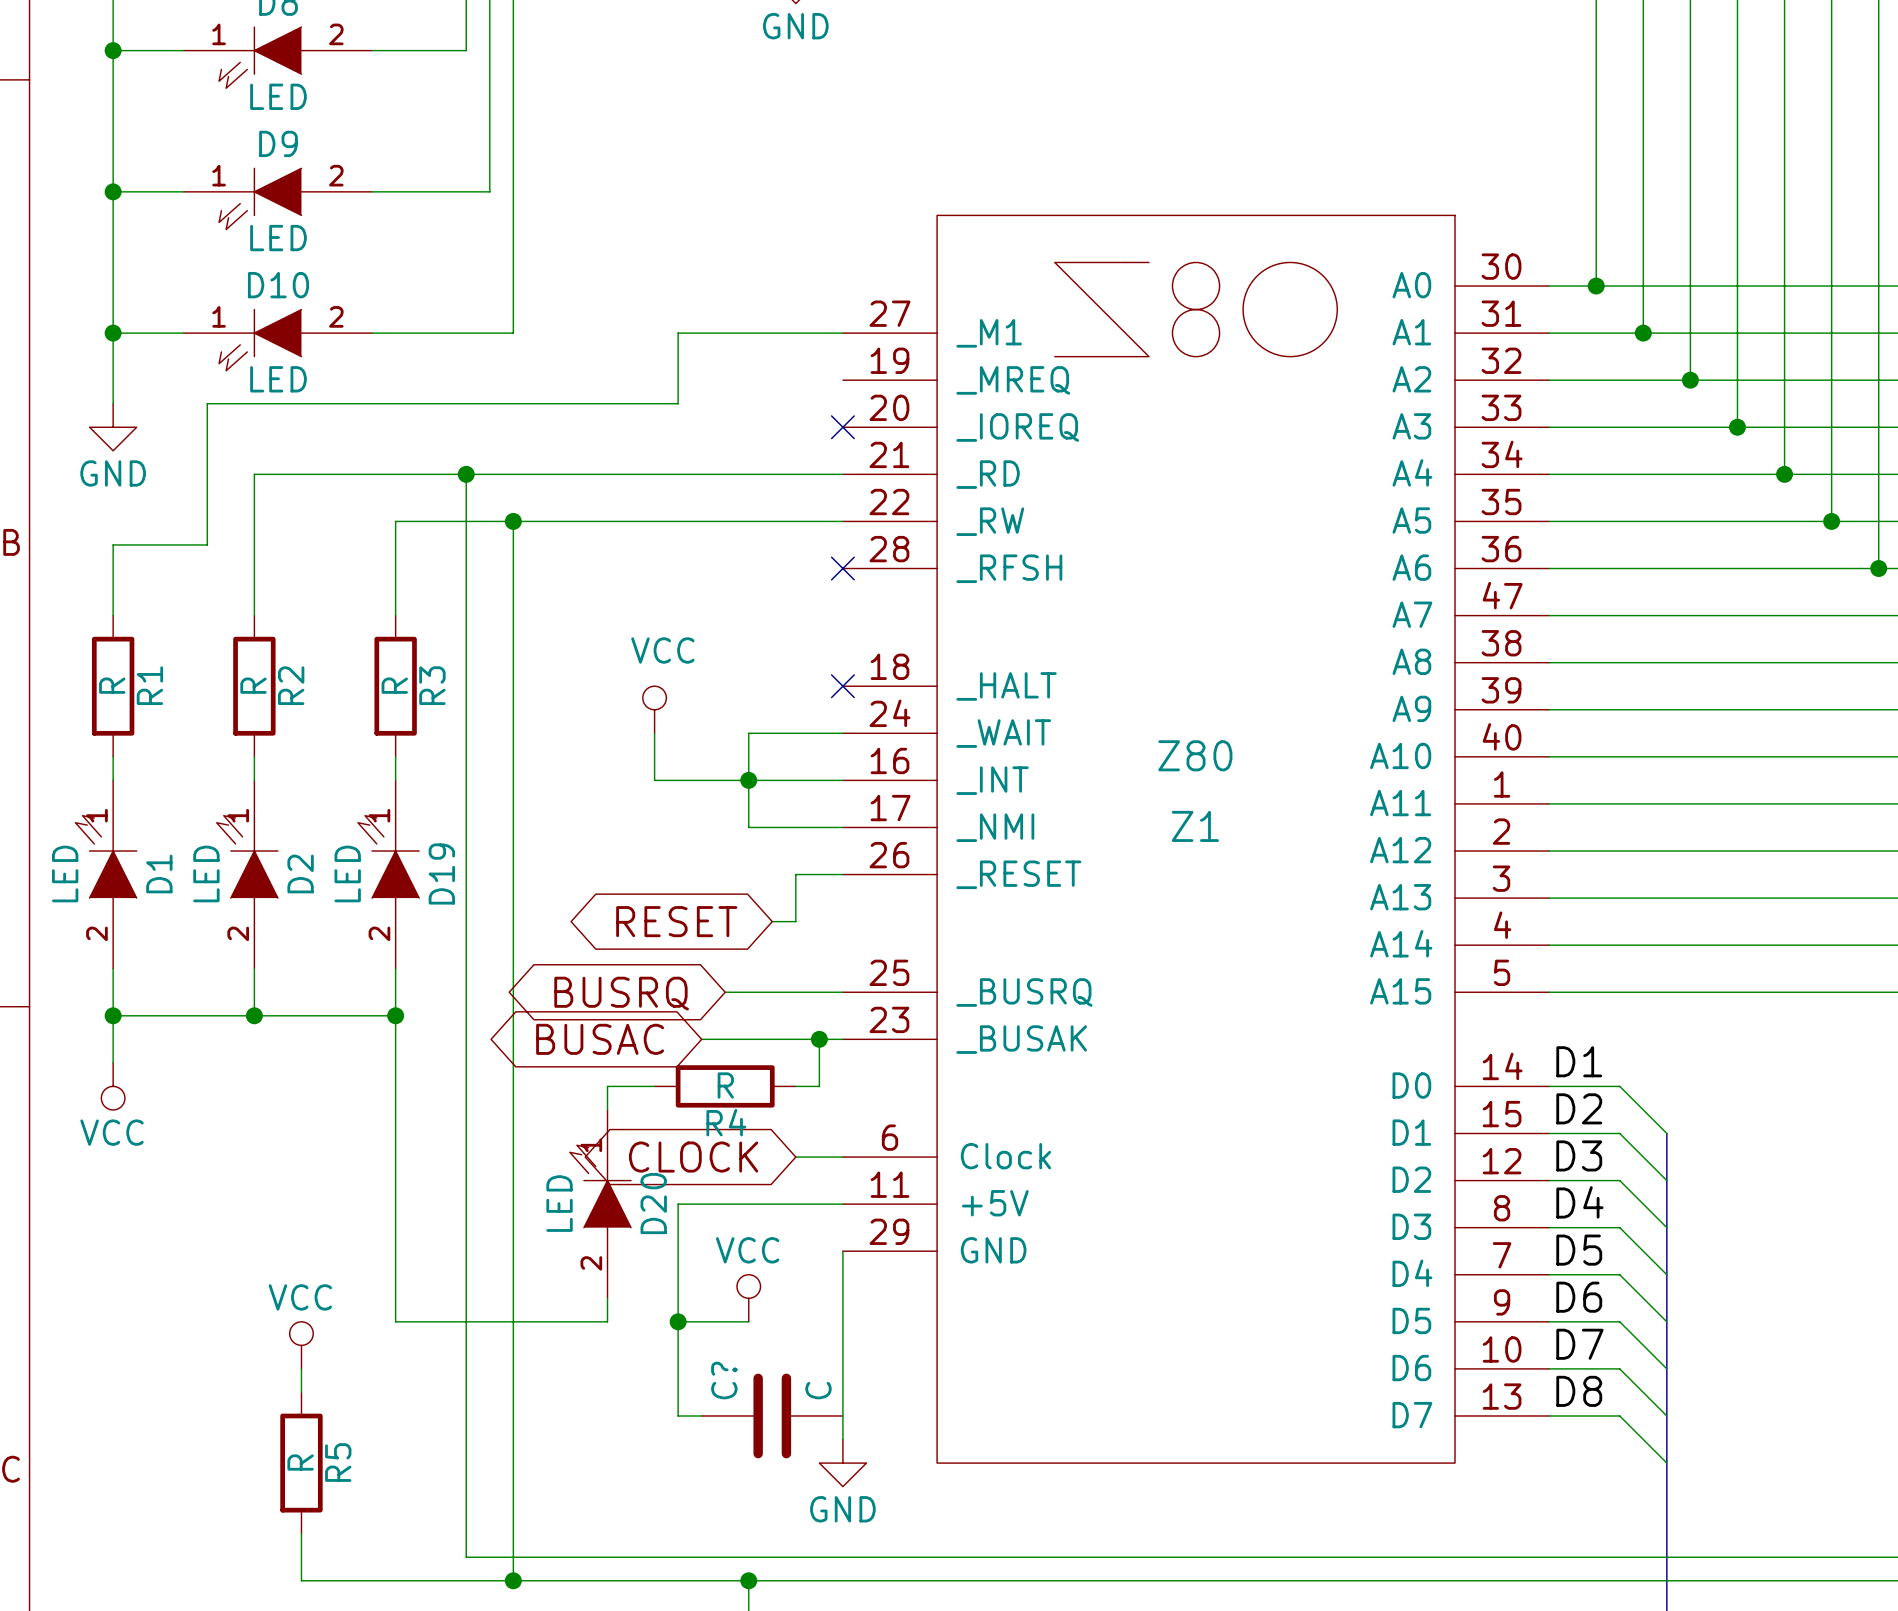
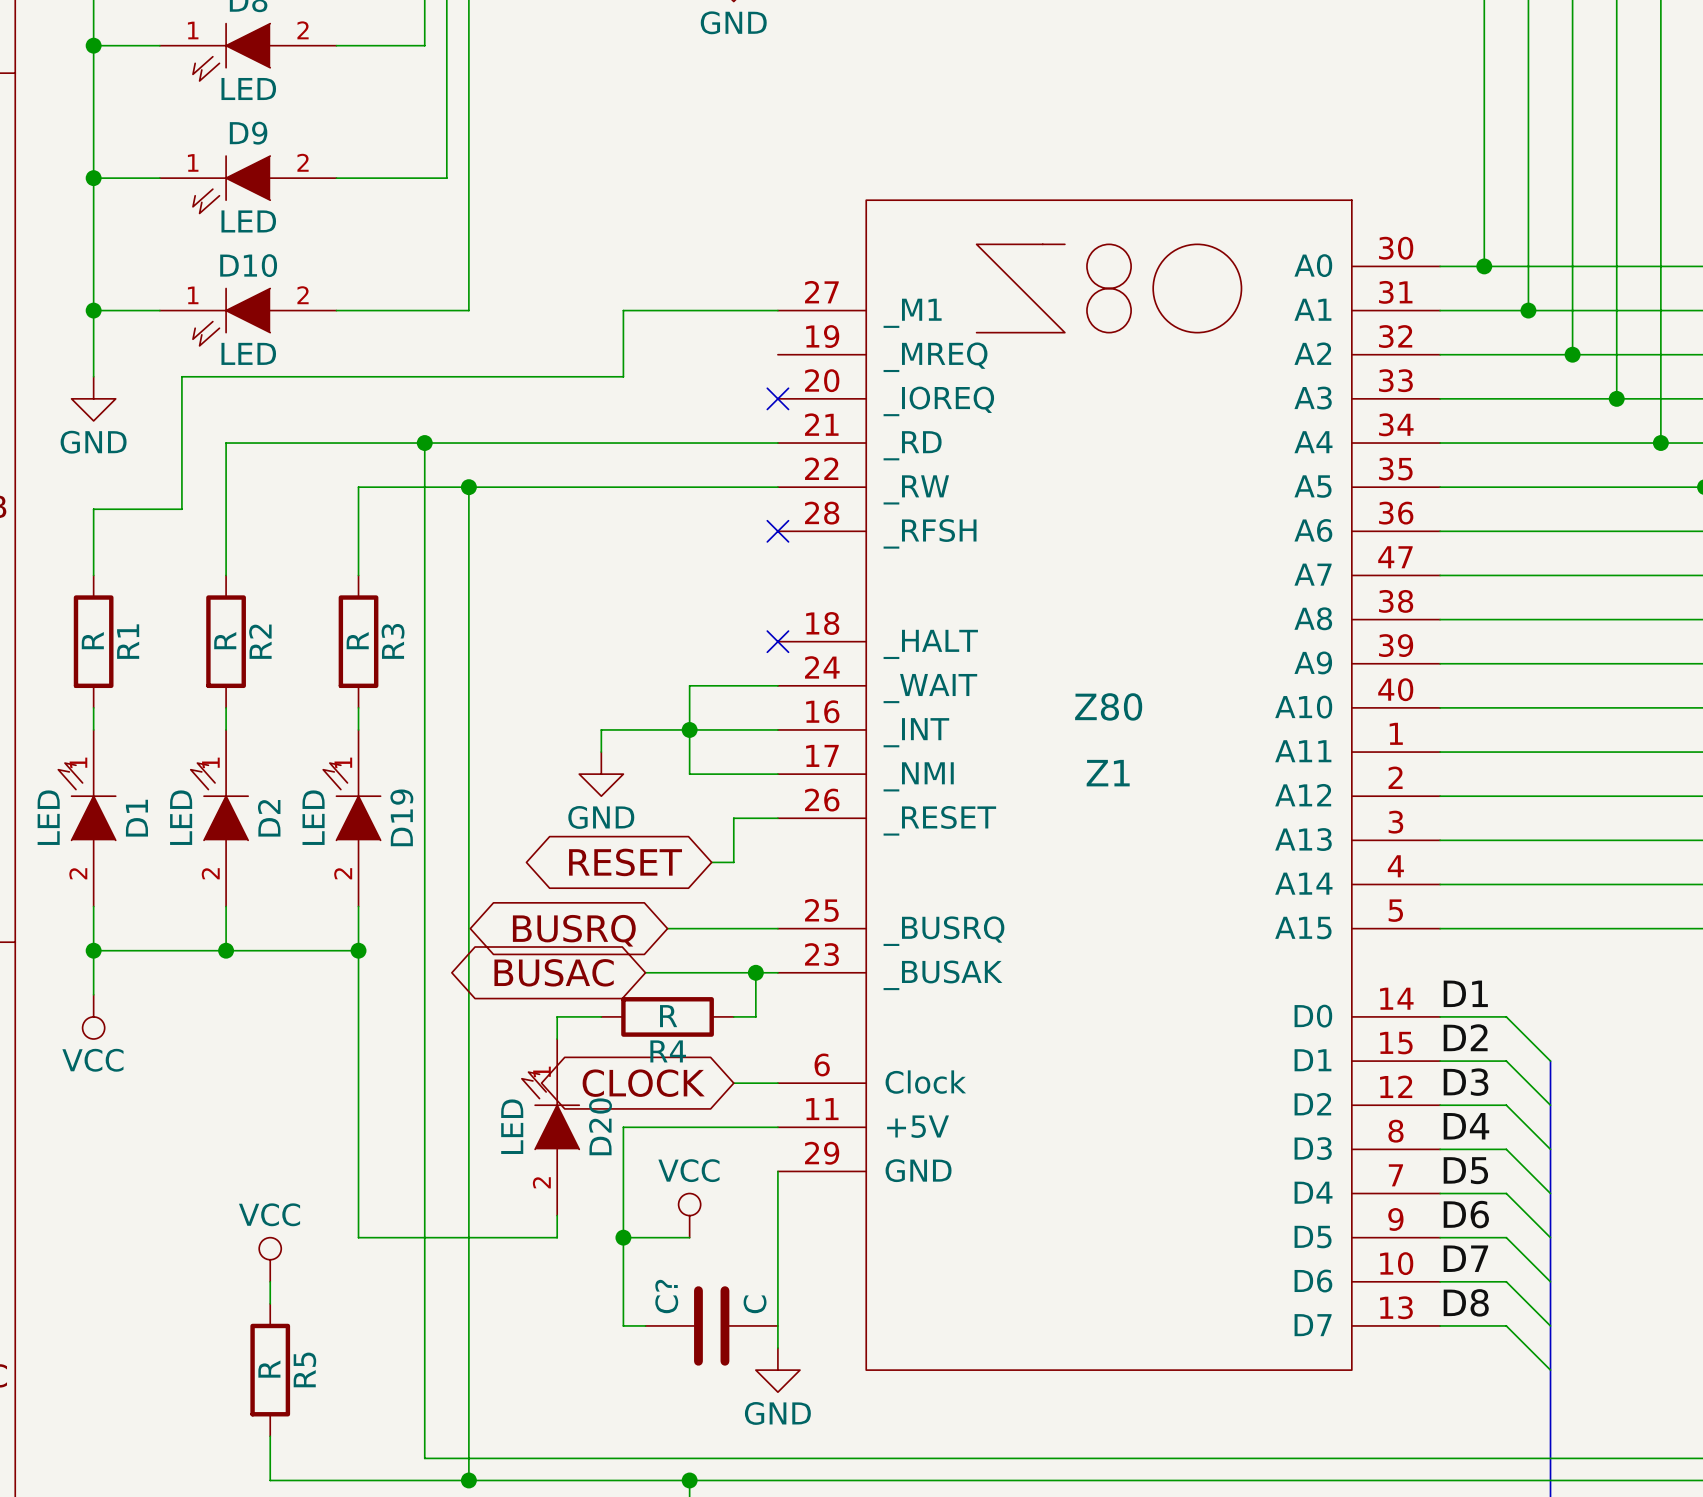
power symbol: VCC (654, 709) -> none
wire: (654, 733) (654, 780) -> (601, 752) (601, 729)
power symbol: none -> GND (601, 774)

